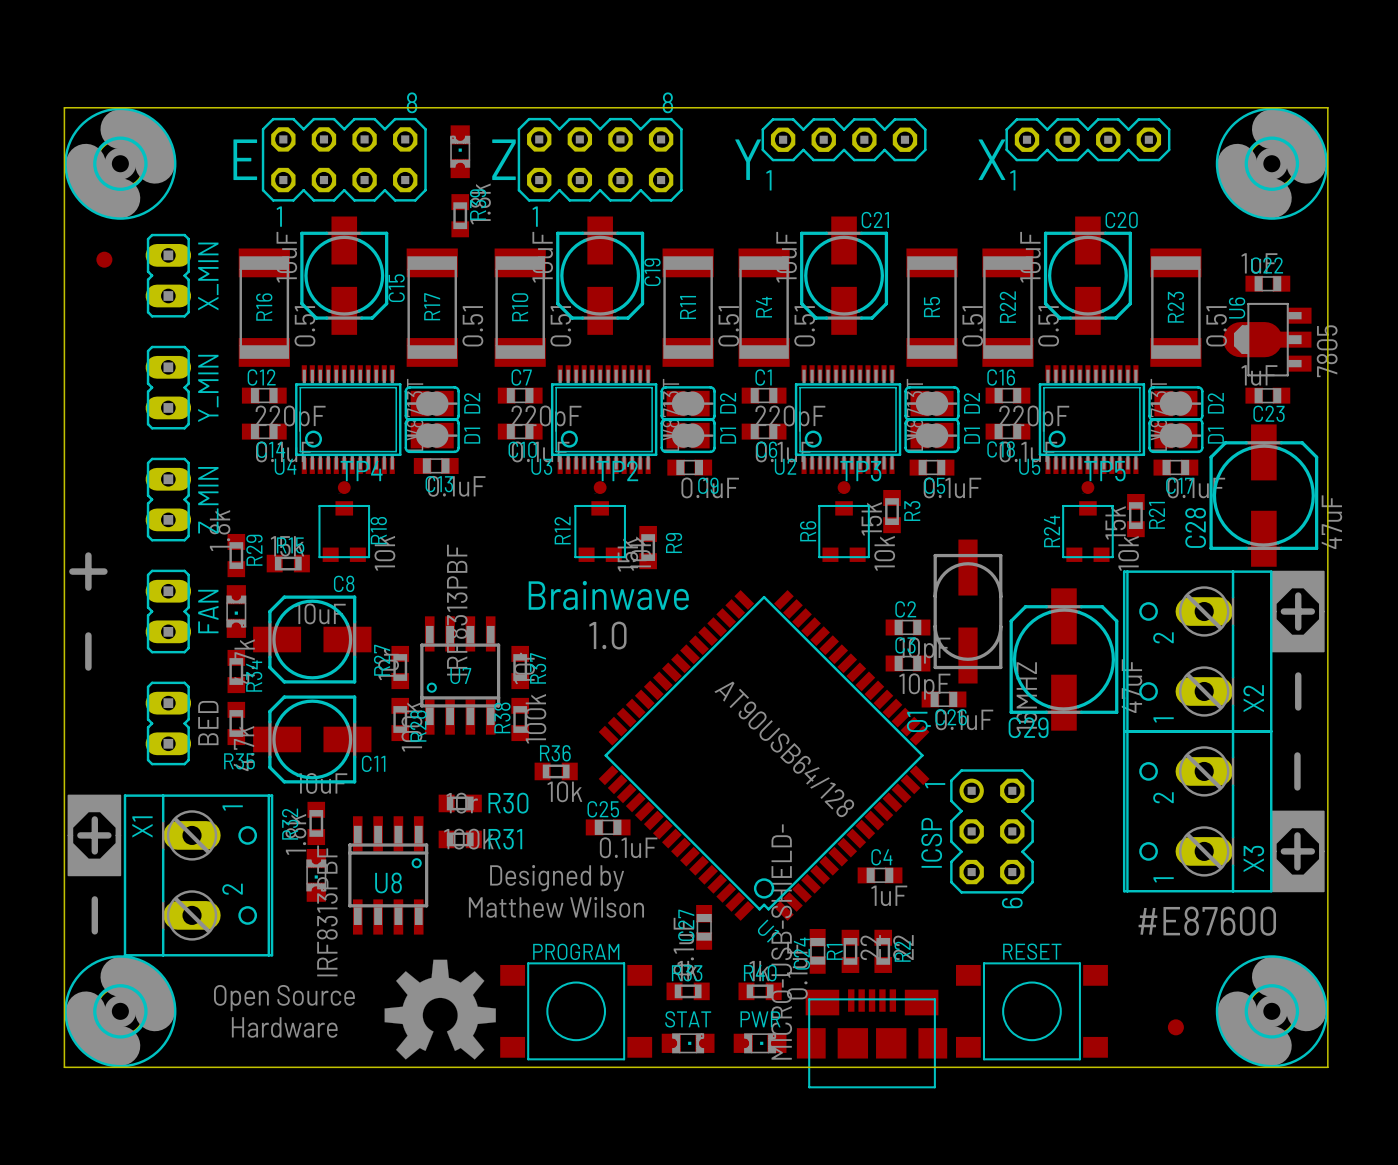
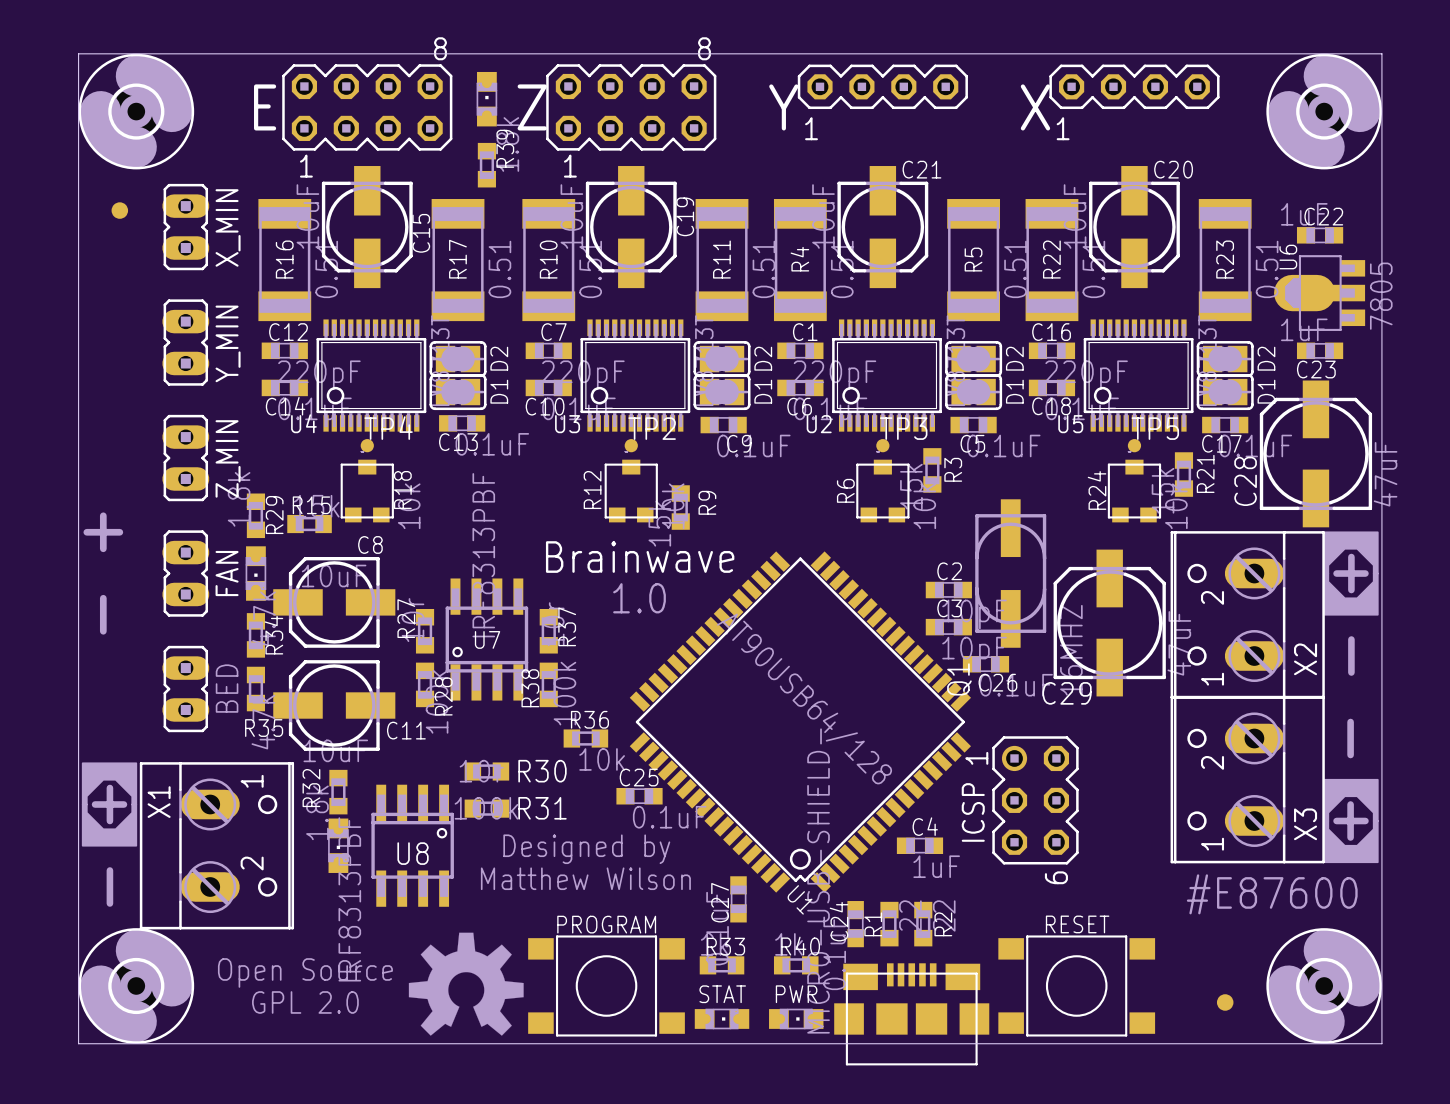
text: Hardware (284, 1027) -> GPL 2.0 (305, 1002)

